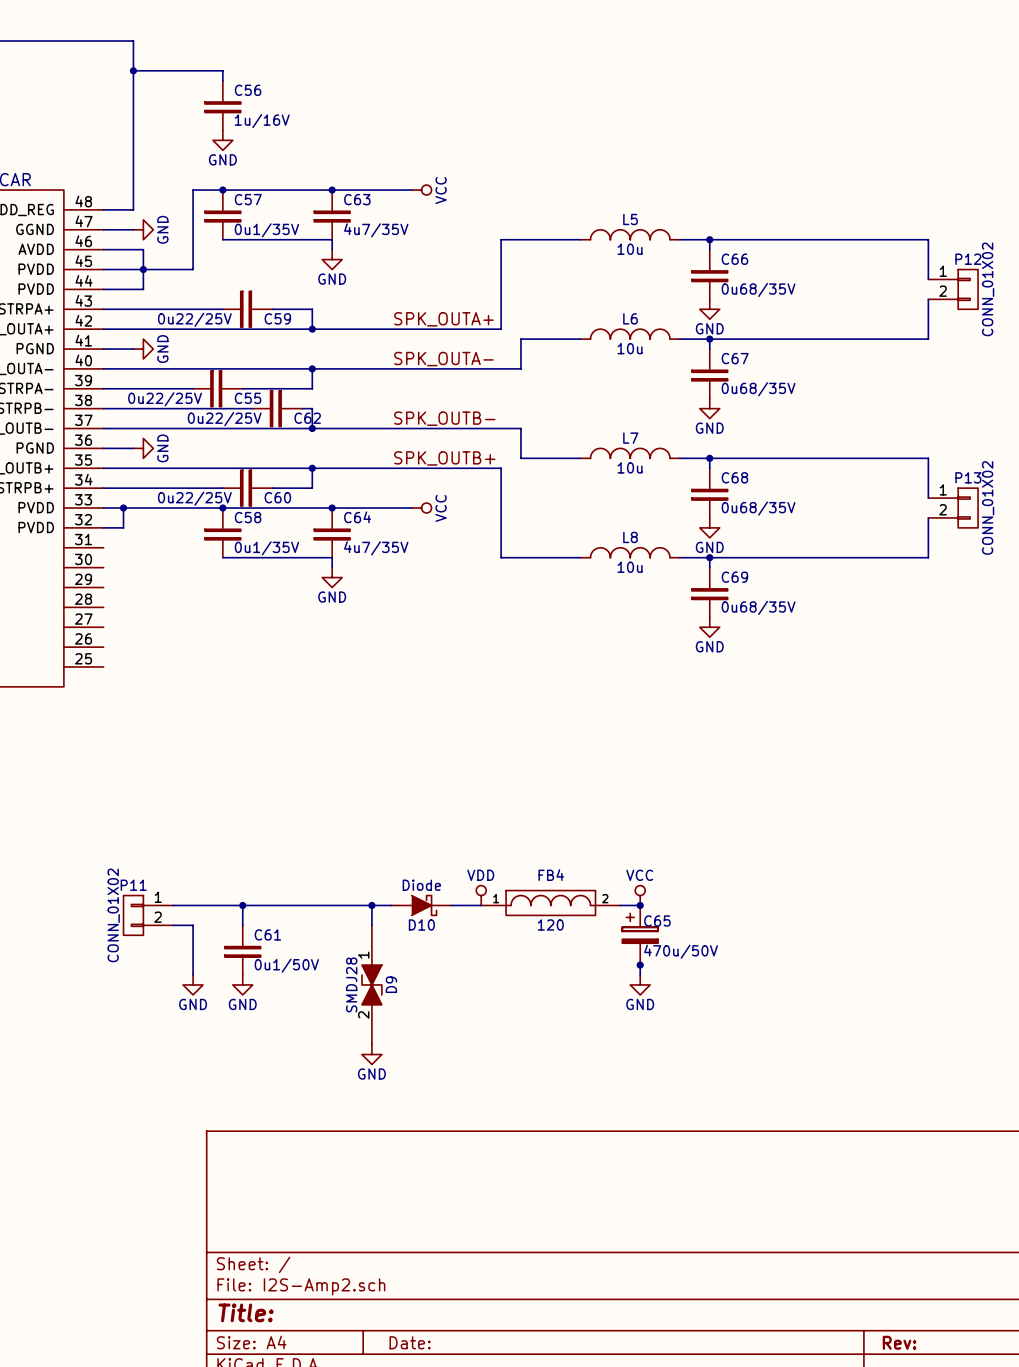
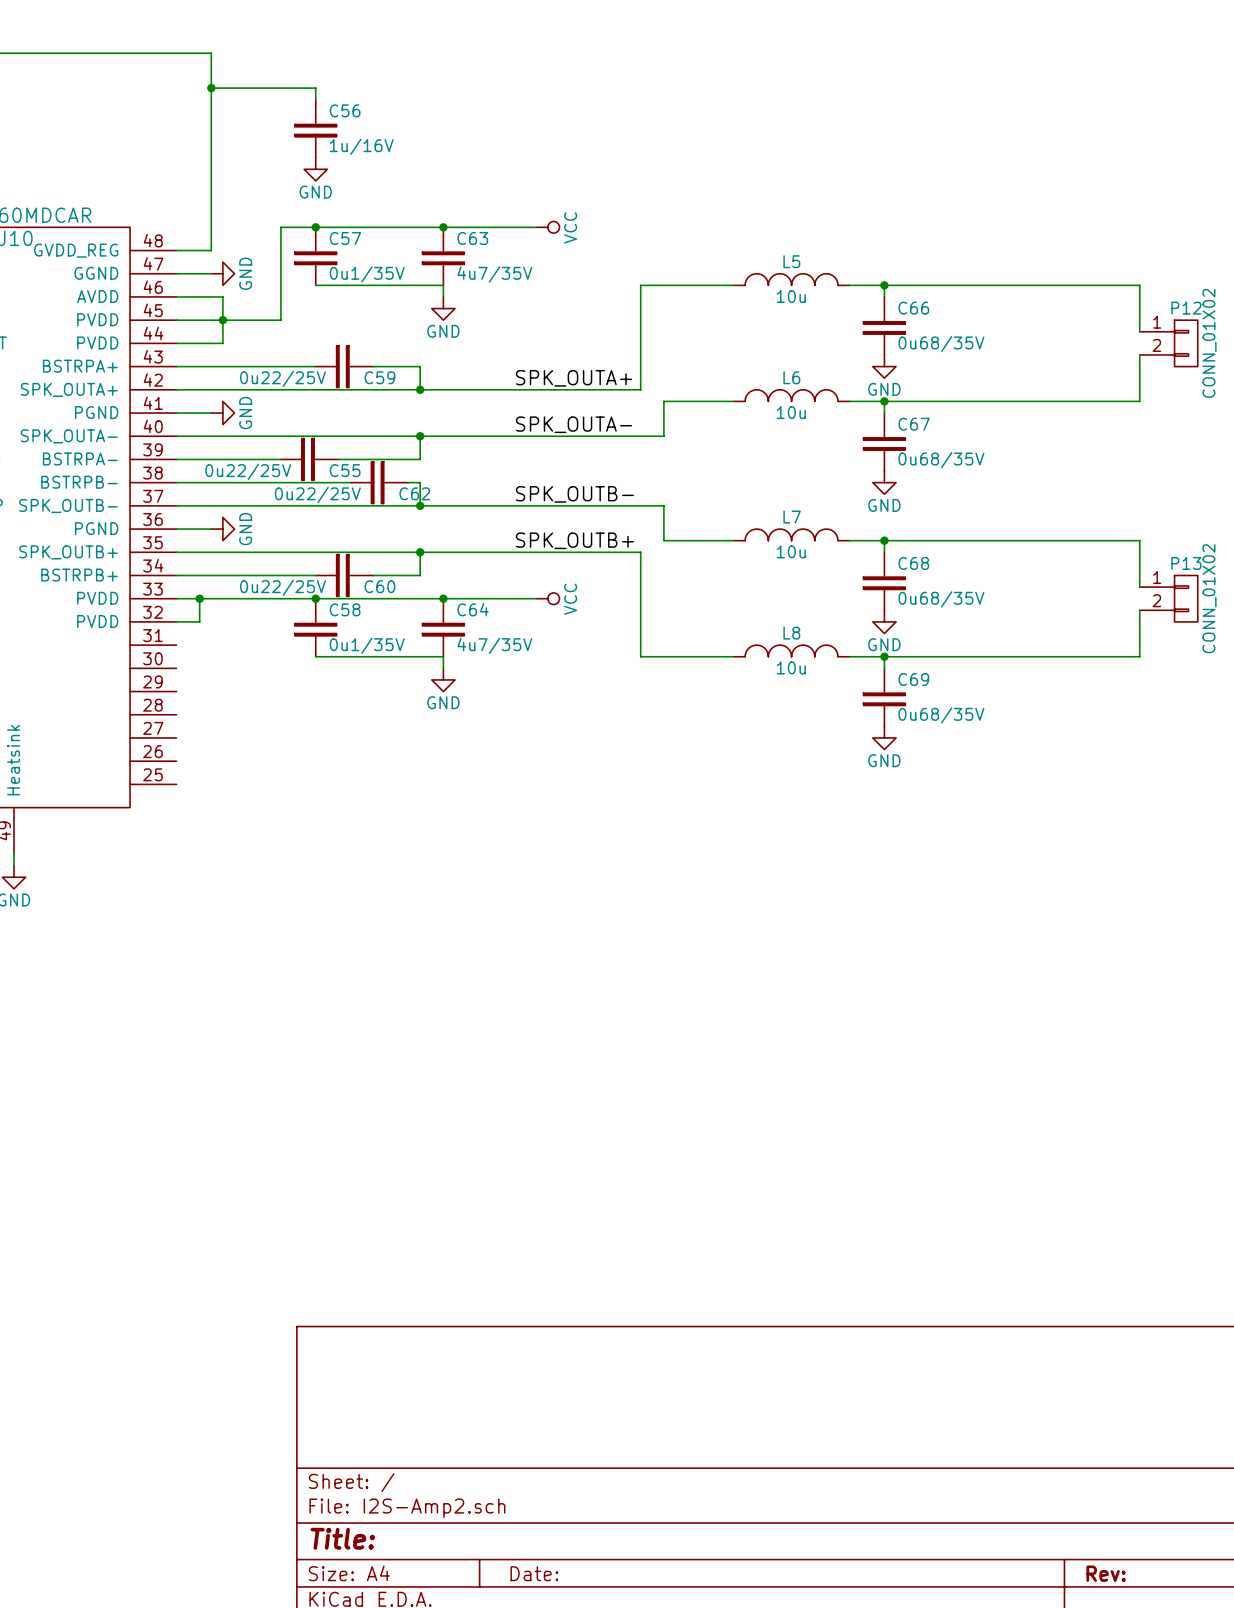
power symbol: VDD (481, 895) -> none
power symbol: VCC (640, 895) -> none
FB4: 120 (550, 902) -> none
wire: (173, 905) (391, 905) -> none
wire: (242, 905) (242, 925) -> none
junction: (242, 905) -> none
wire: (371, 905) (371, 925) -> none
junction: (371, 905) -> none
D10: Diode (421, 905) -> none
wire: (451, 905) (481, 905) -> none
wire: (620, 905) (640, 905) -> none
junction: (640, 905) -> none
P11: CONN_01X02 (148, 915) -> none
wire: (173, 925) (193, 925) (193, 975) -> none
C65: 470u/50V (640, 935) -> none
C61: 0u1/50V (242, 950) -> none
wire: (640, 965) (640, 975) -> none
junction: (640, 965) -> none
power symbol: GND (193, 984) -> none
power symbol: GND (242, 984) -> none
D9: SMDJ28 (371, 984) -> none
power symbol: GND (640, 984) -> none
power symbol: GND (371, 1054) -> none

